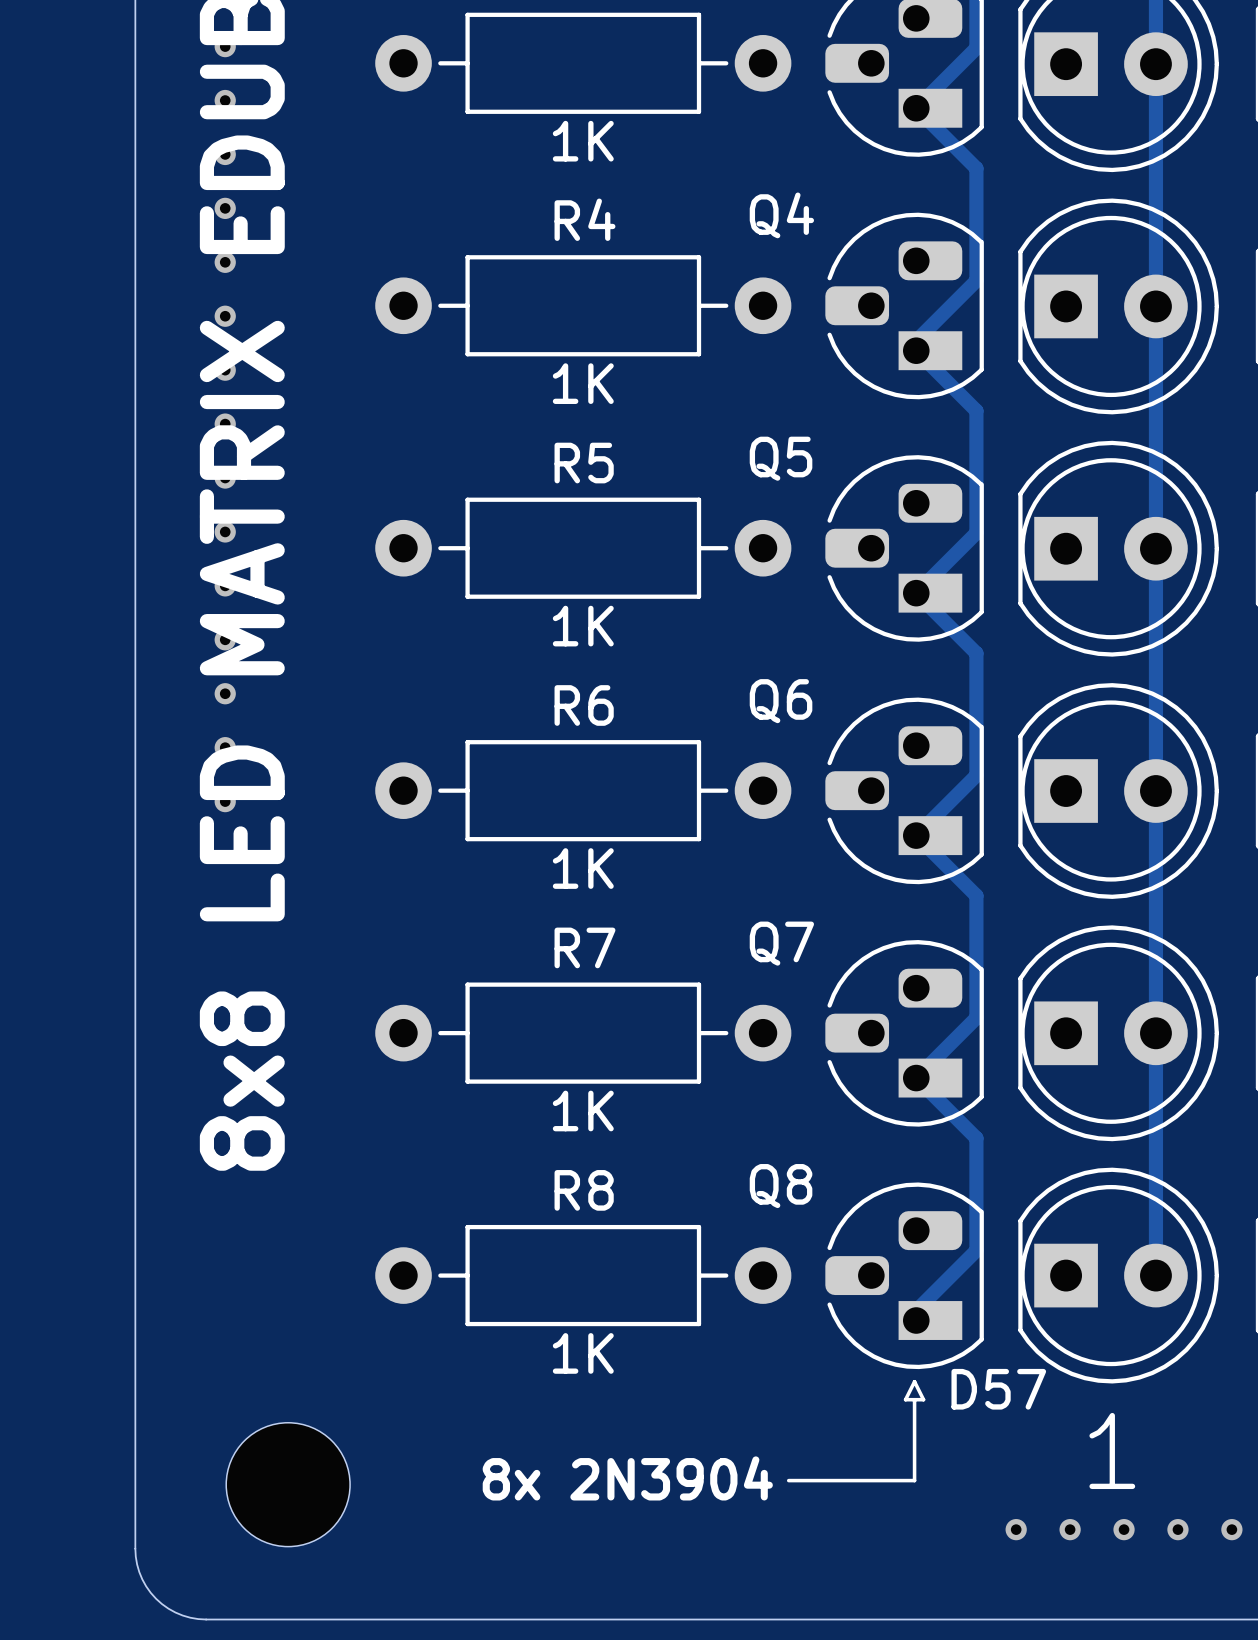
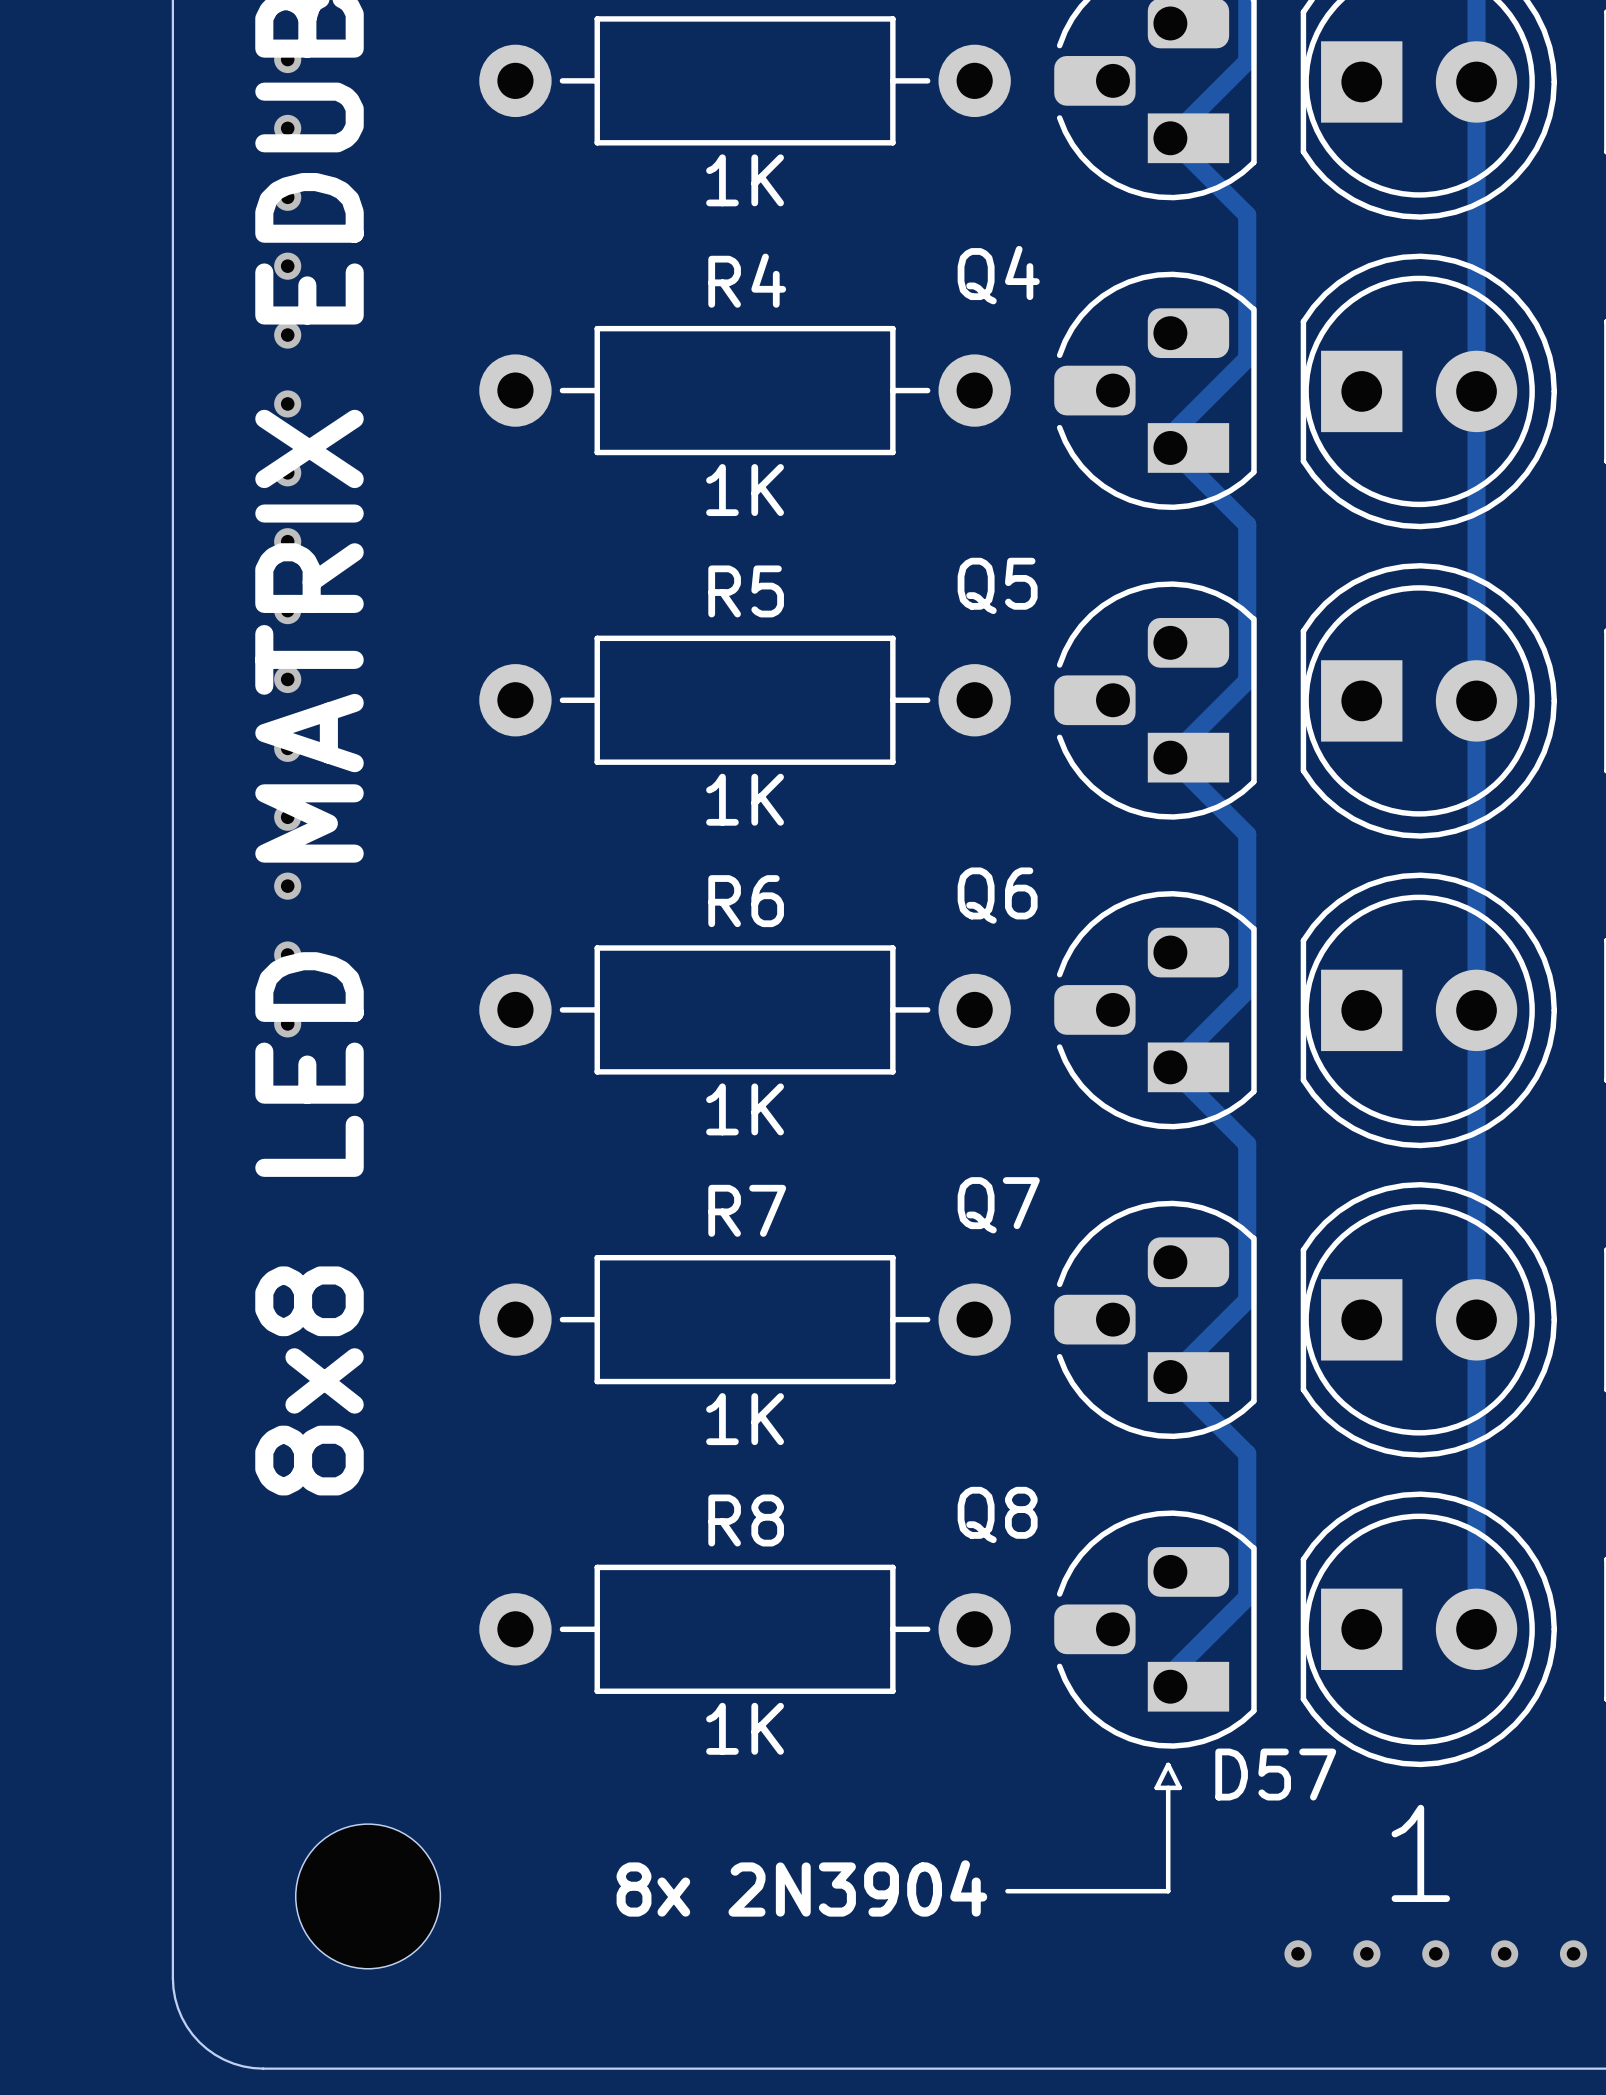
part footprint: [226, 1422, 351, 1547] -> [295, 1824, 441, 1969]

